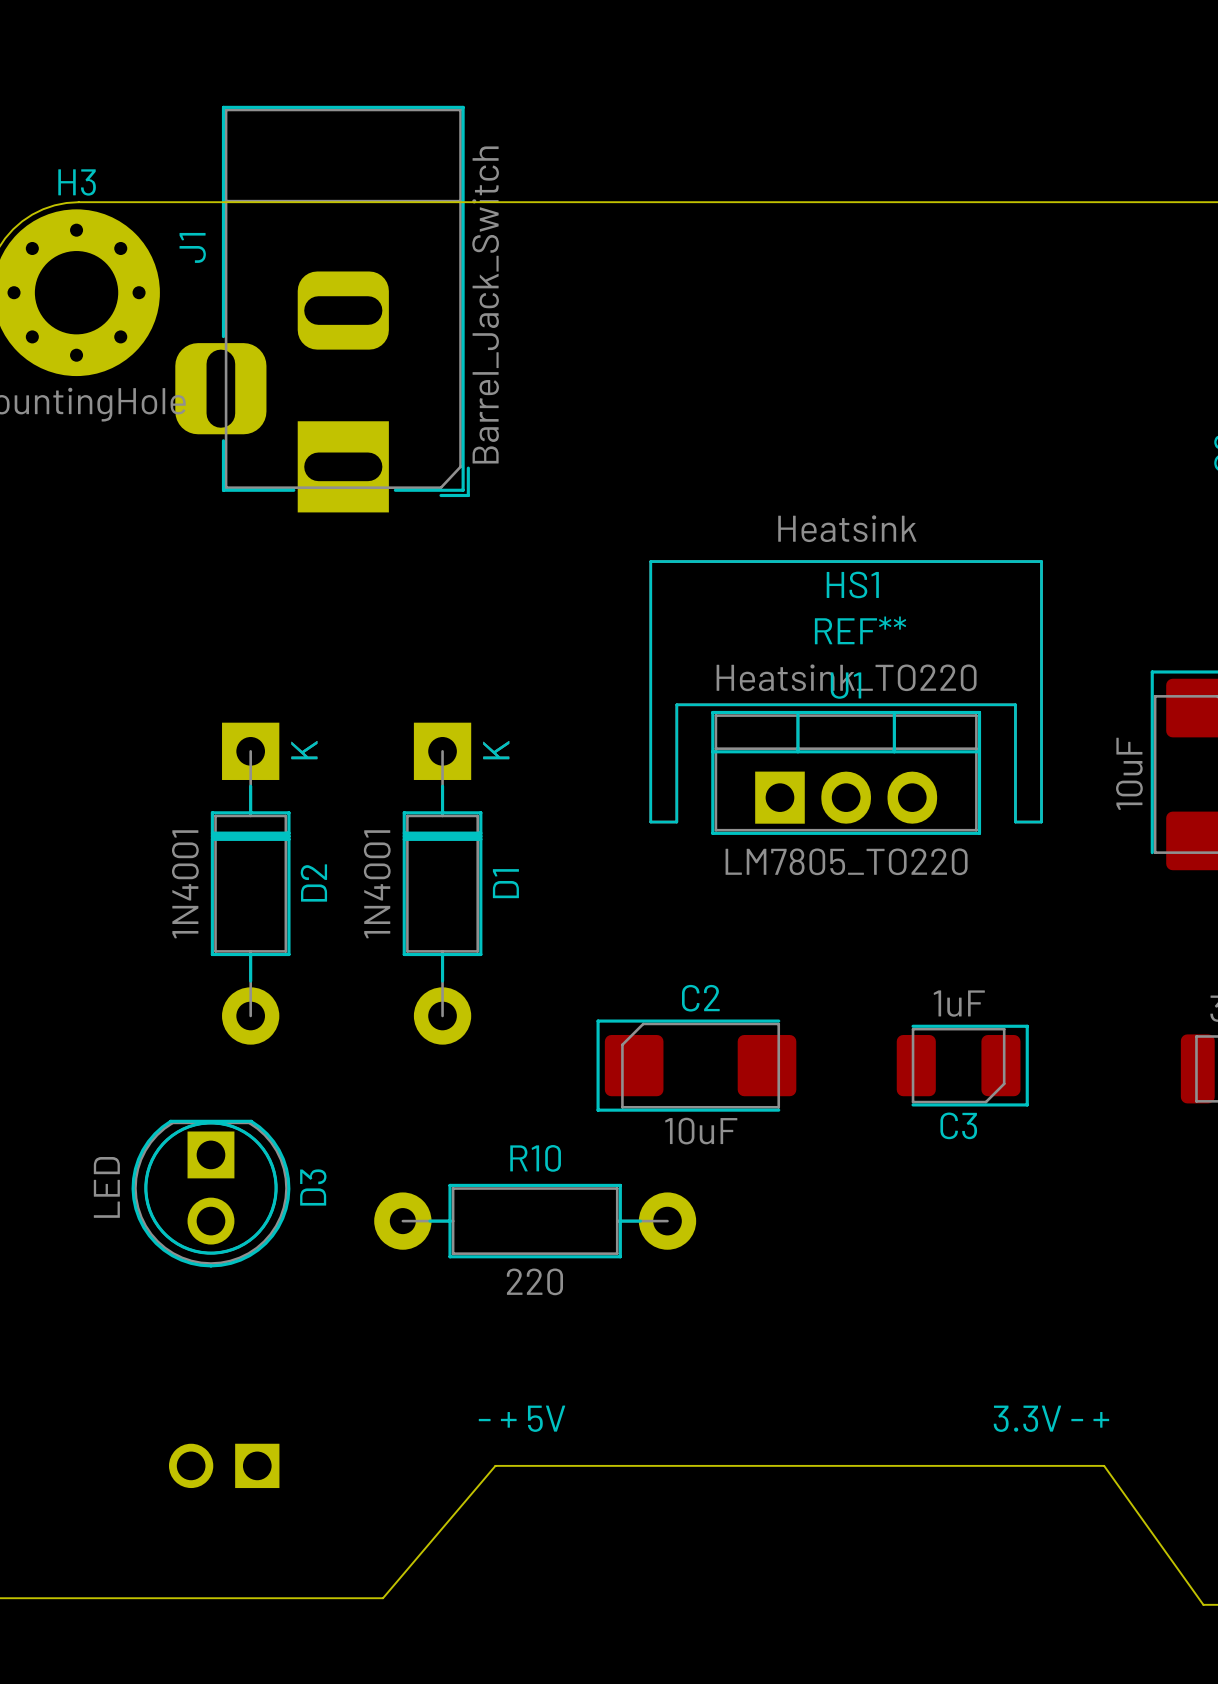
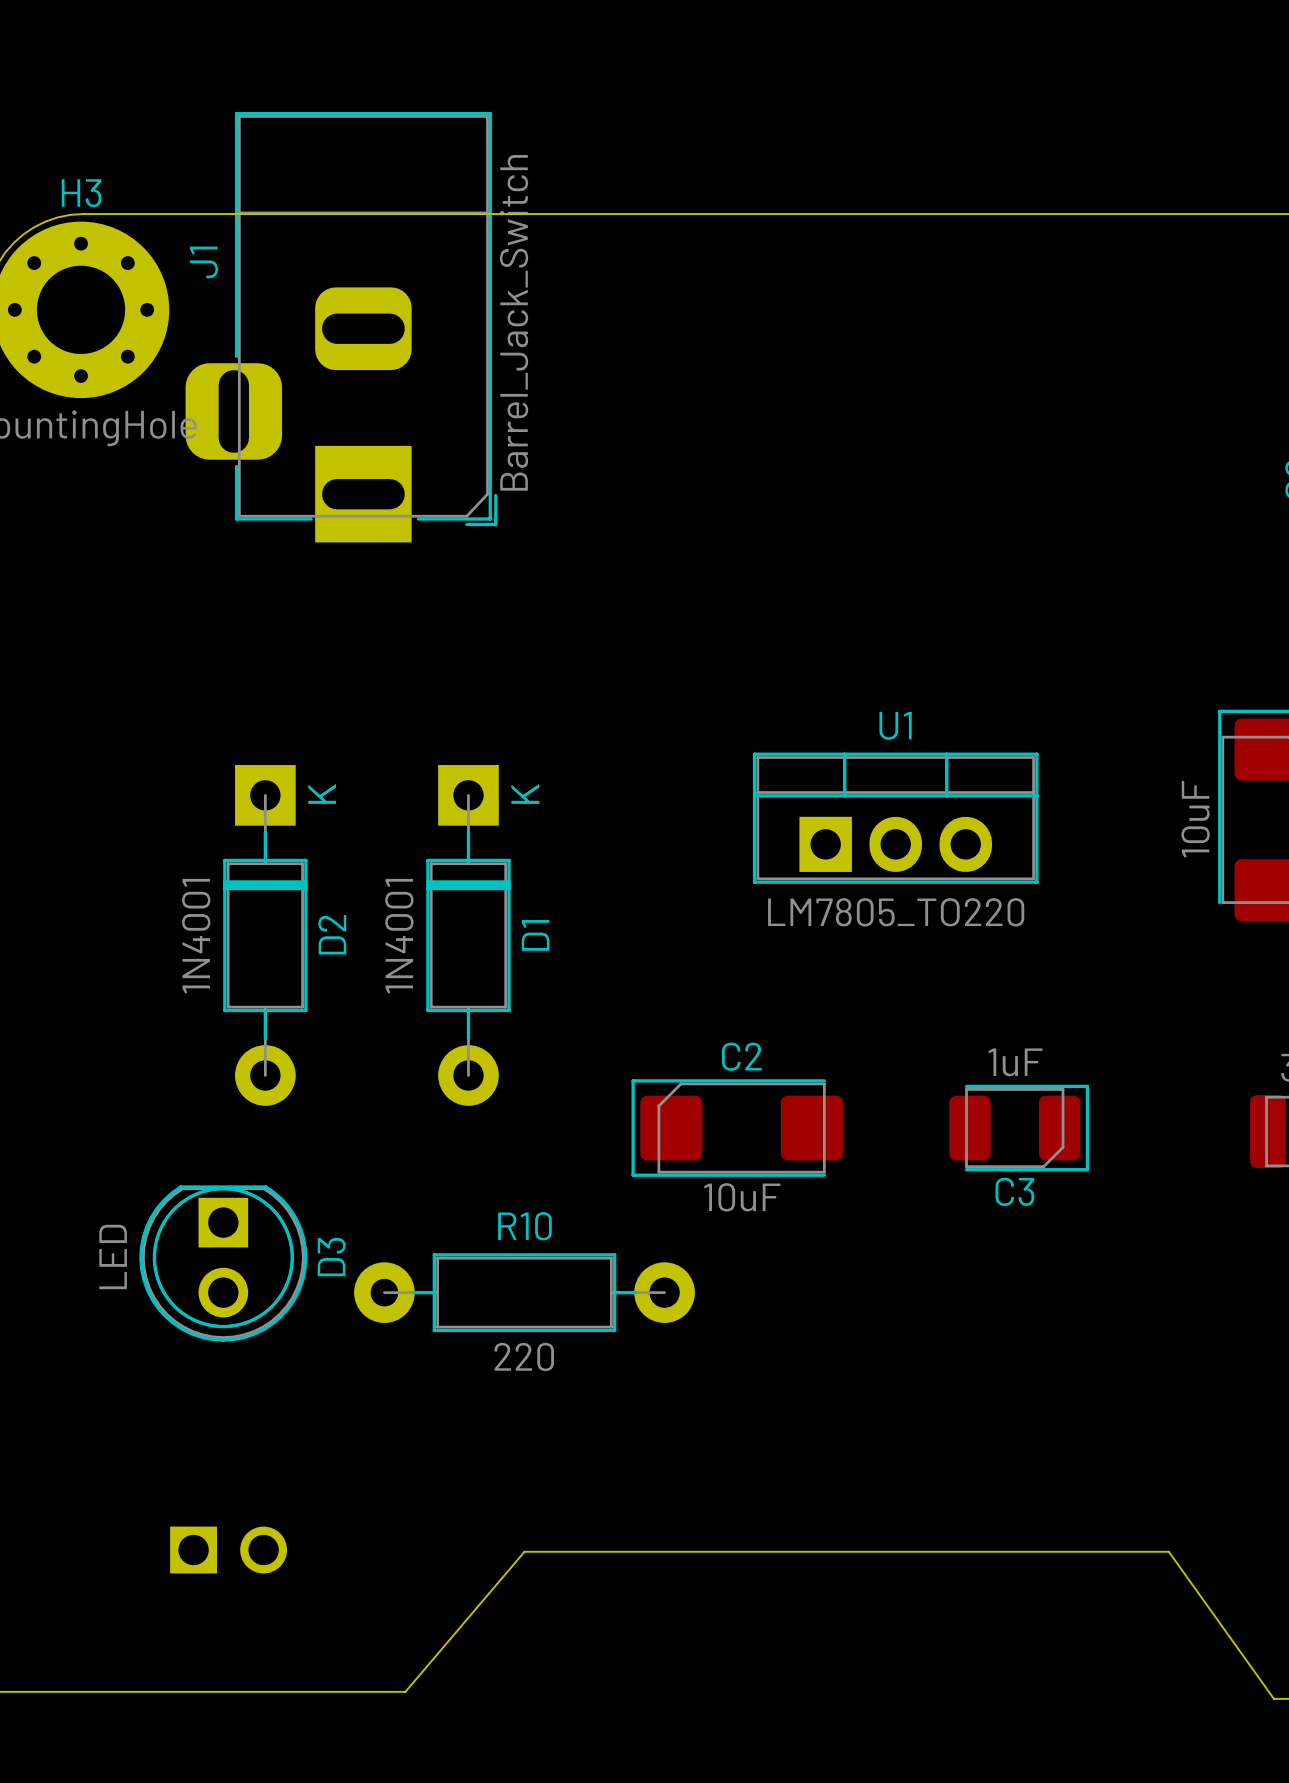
HS1: Heatsink (846, 691) -> none
R10 position: (535, 1221) -> (524, 1292)
text: - + 5V (522, 1418) -> none
text: 3.3V - + (1051, 1418) -> none
part rotation: 0° (224, 1465) -> 180° (228, 1550)

